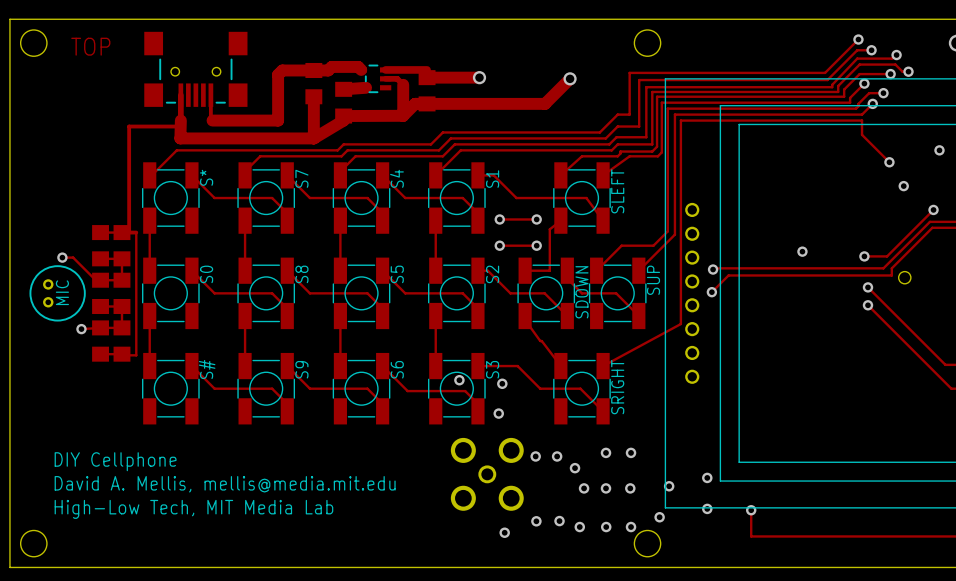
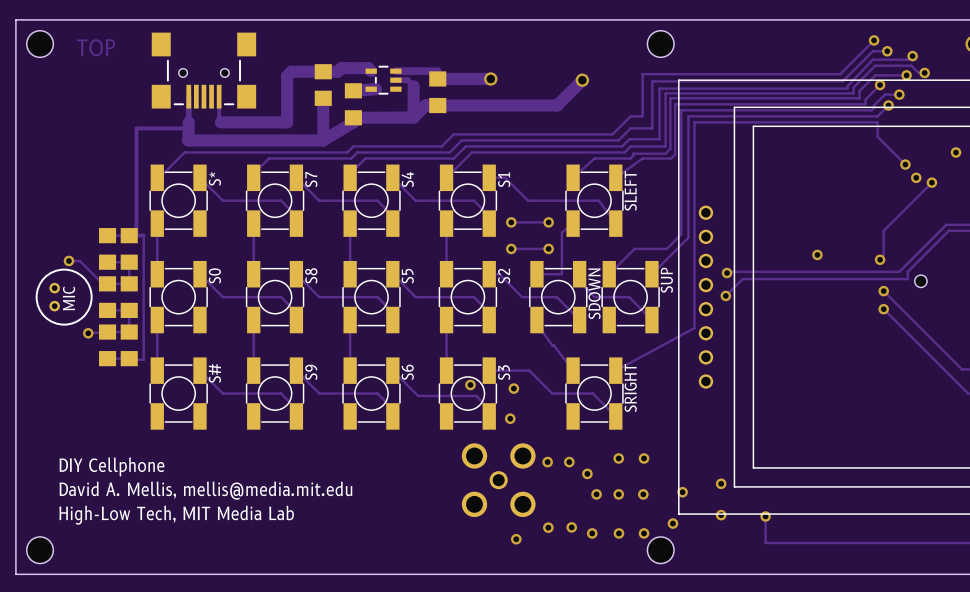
via: none -> (916, 177)
track: none -> (931, 182) (883, 230) (883, 254)
via: none -> (931, 182)
via: (903, 186) -> none
track: (933, 209) (887, 256) (864, 256) -> none
via: (933, 209) -> none

